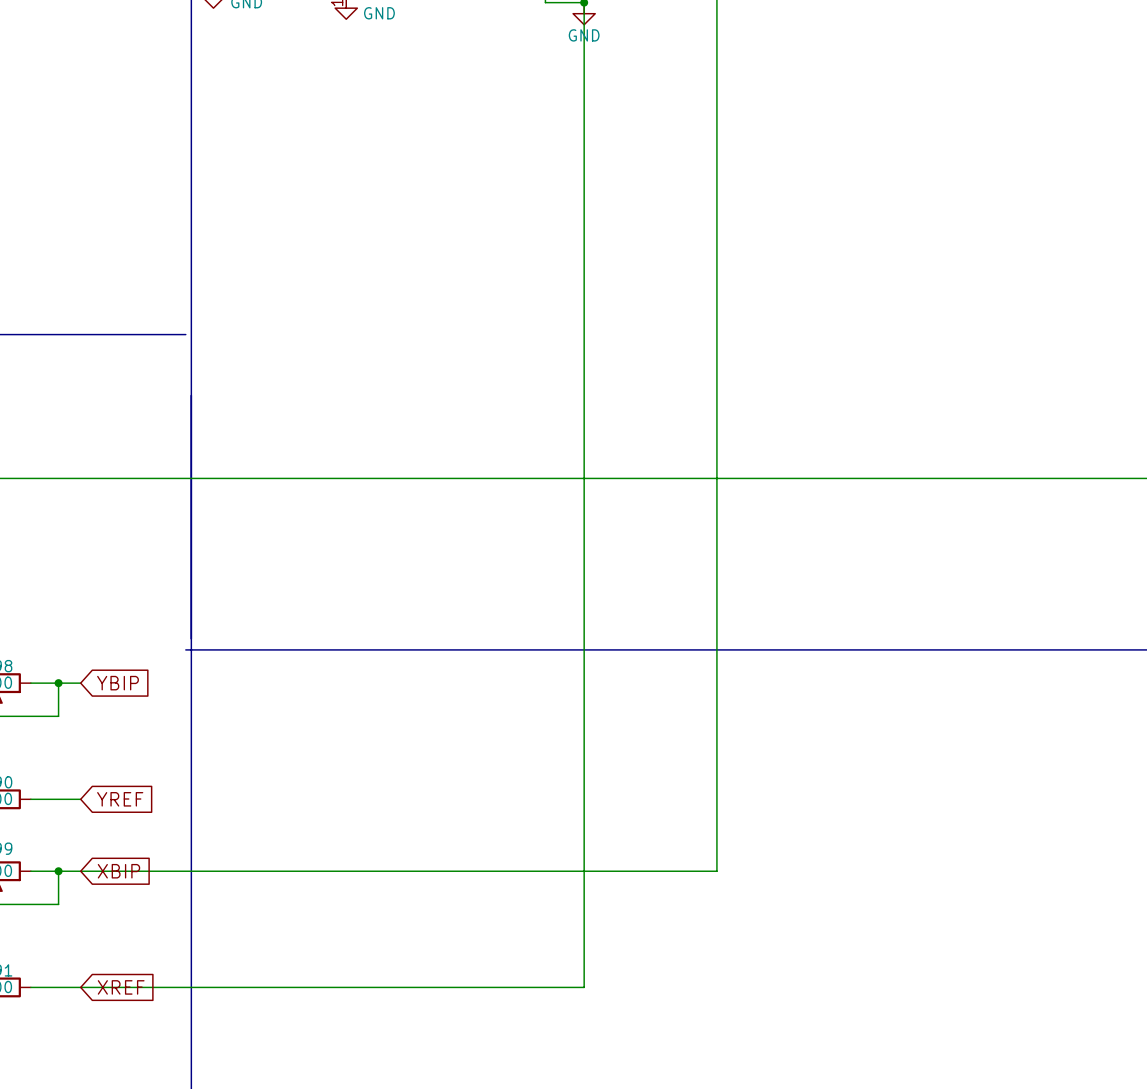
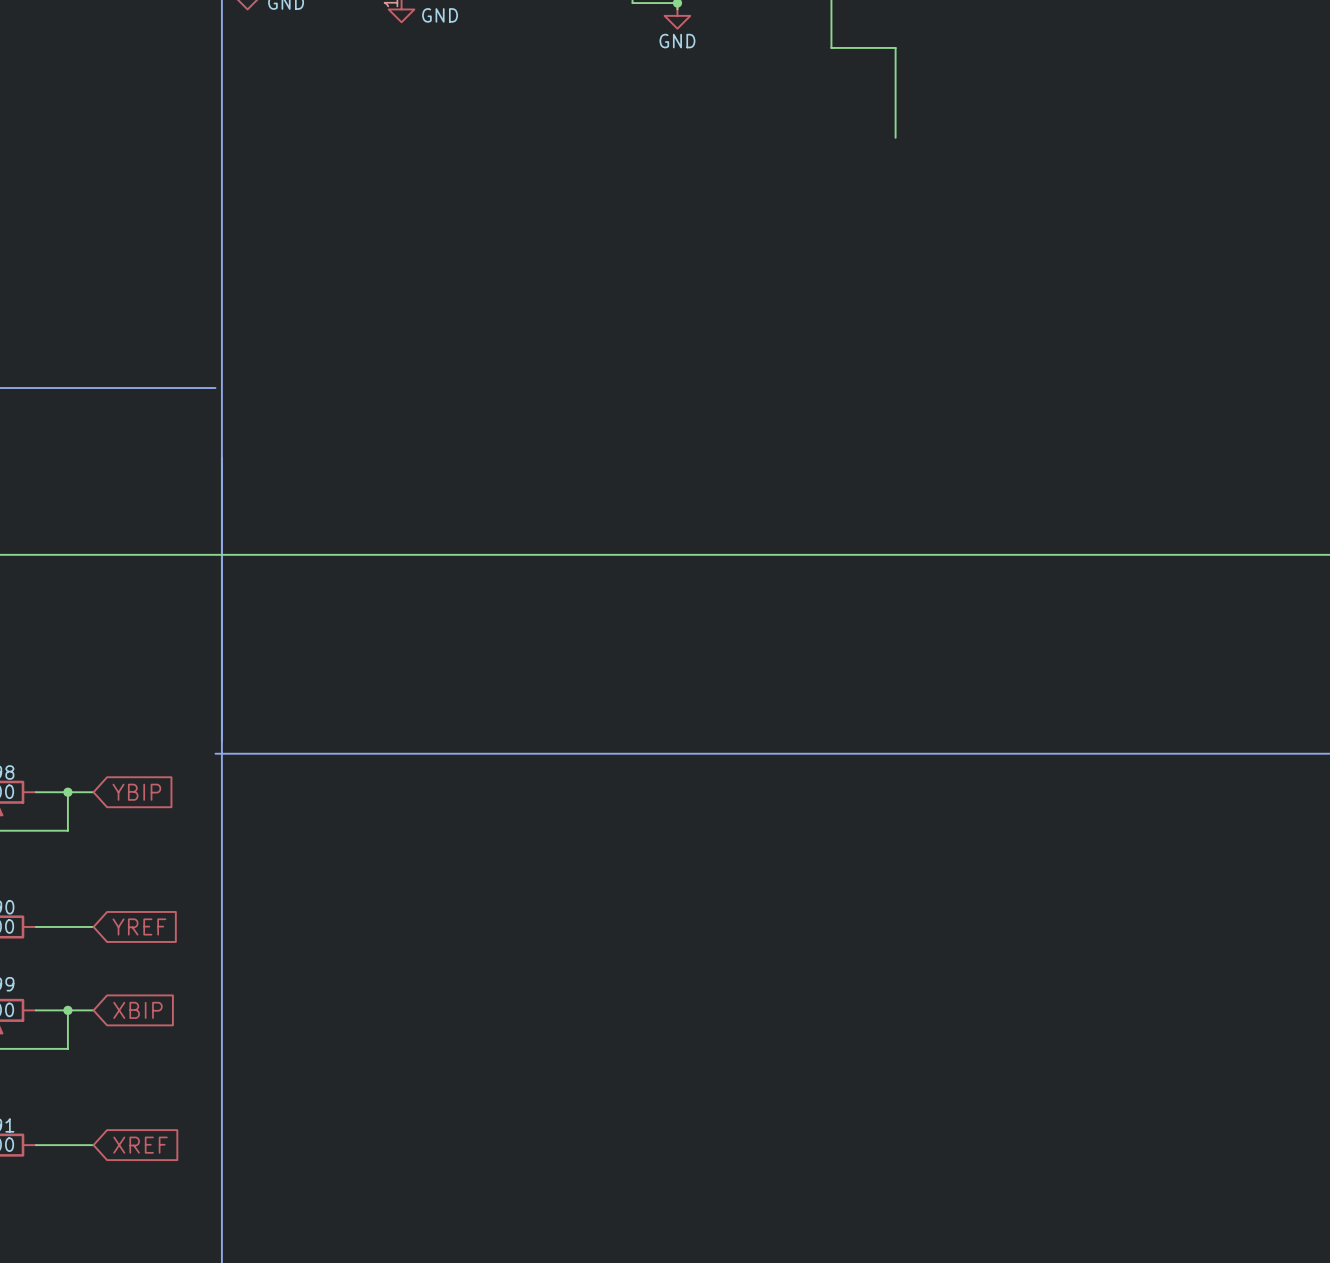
wire: (584, 8) (584, 987) (80, 987) -> none
wire: (716, 41) (716, 871) (80, 871) -> (831, 47) (895, 47) (895, 137)

